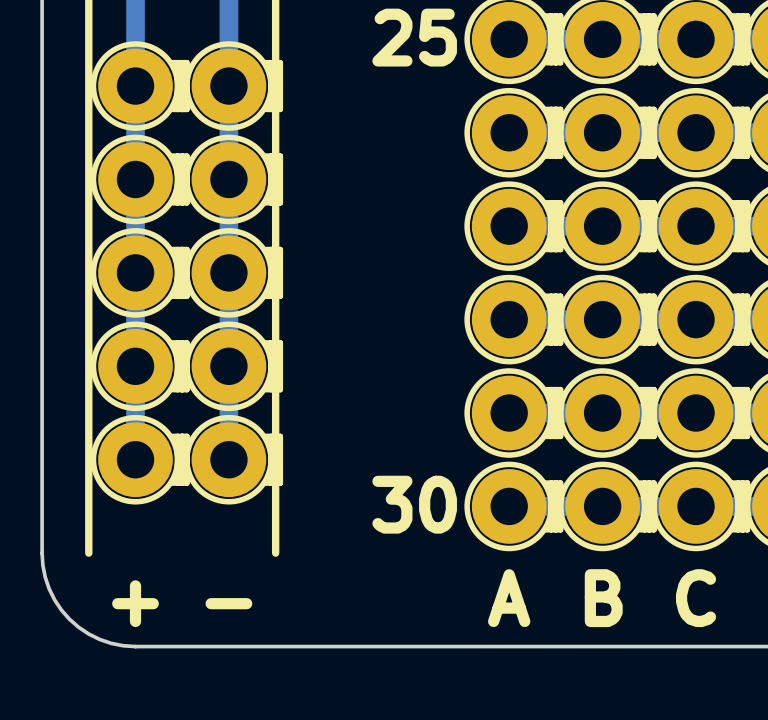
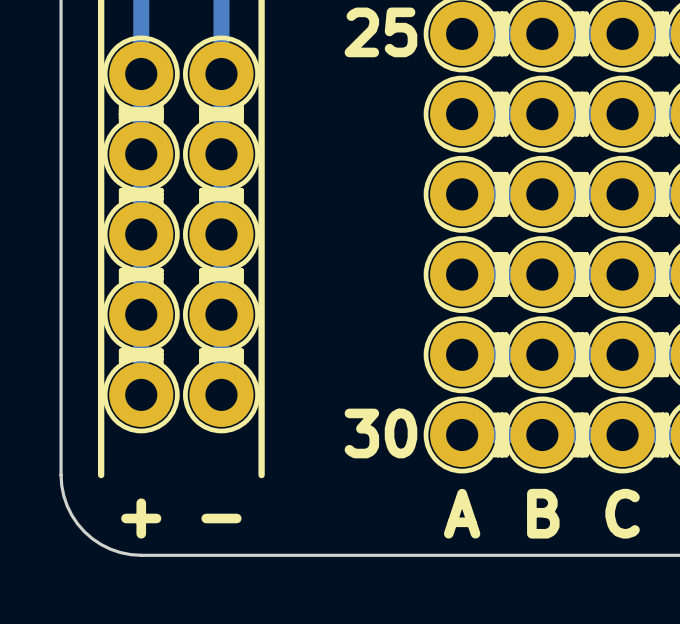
part rotation: 0° (140, 86) -> 90° clockwise (141, 78)
part rotation: 0° (233, 86) -> 90° clockwise (221, 78)
part rotation: 0° (140, 179) -> 90° counterclockwise (141, 150)
part rotation: 0° (233, 179) -> 90° counterclockwise (221, 150)
part rotation: 0° (140, 272) -> 90° counterclockwise (141, 230)
part rotation: 0° (233, 272) -> 90° counterclockwise (221, 230)
part rotation: 0° (140, 366) -> 90° counterclockwise (141, 310)
part rotation: 0° (233, 366) -> 90° counterclockwise (221, 310)
part rotation: 0° (140, 459) -> 90° counterclockwise (141, 390)
part rotation: 0° (233, 459) -> 90° counterclockwise (221, 390)

